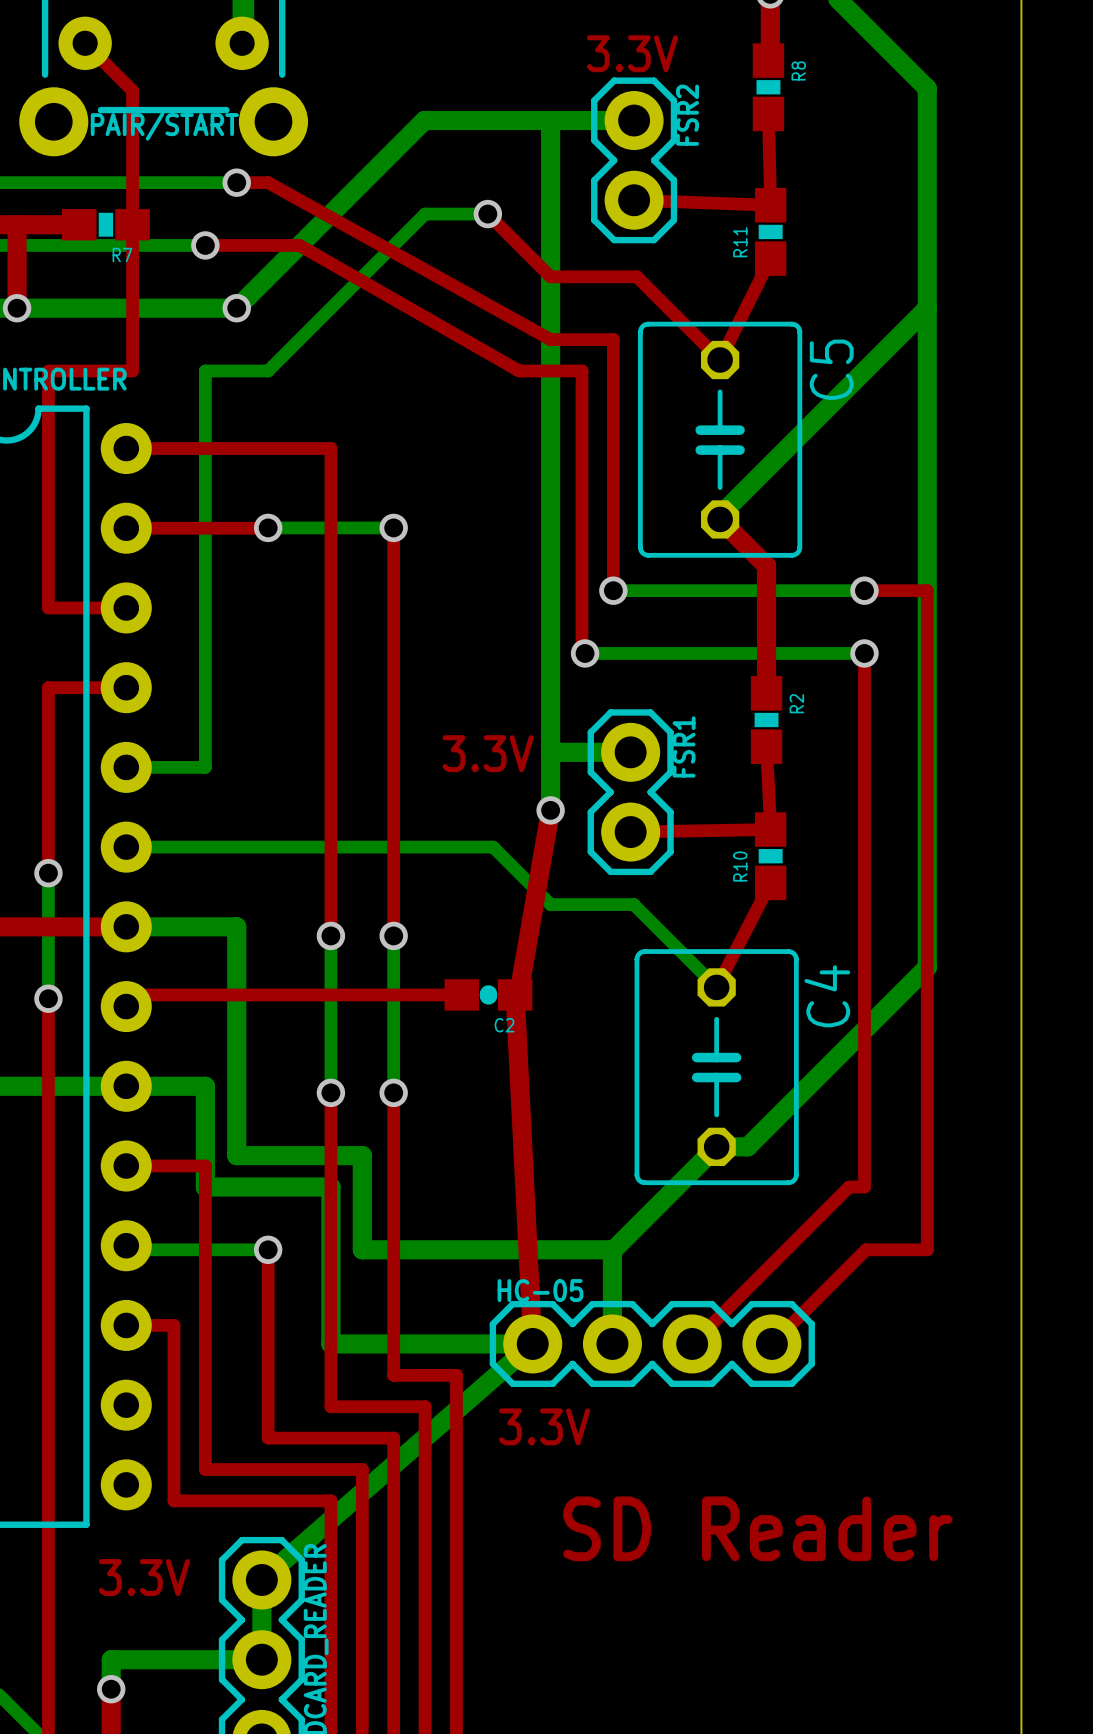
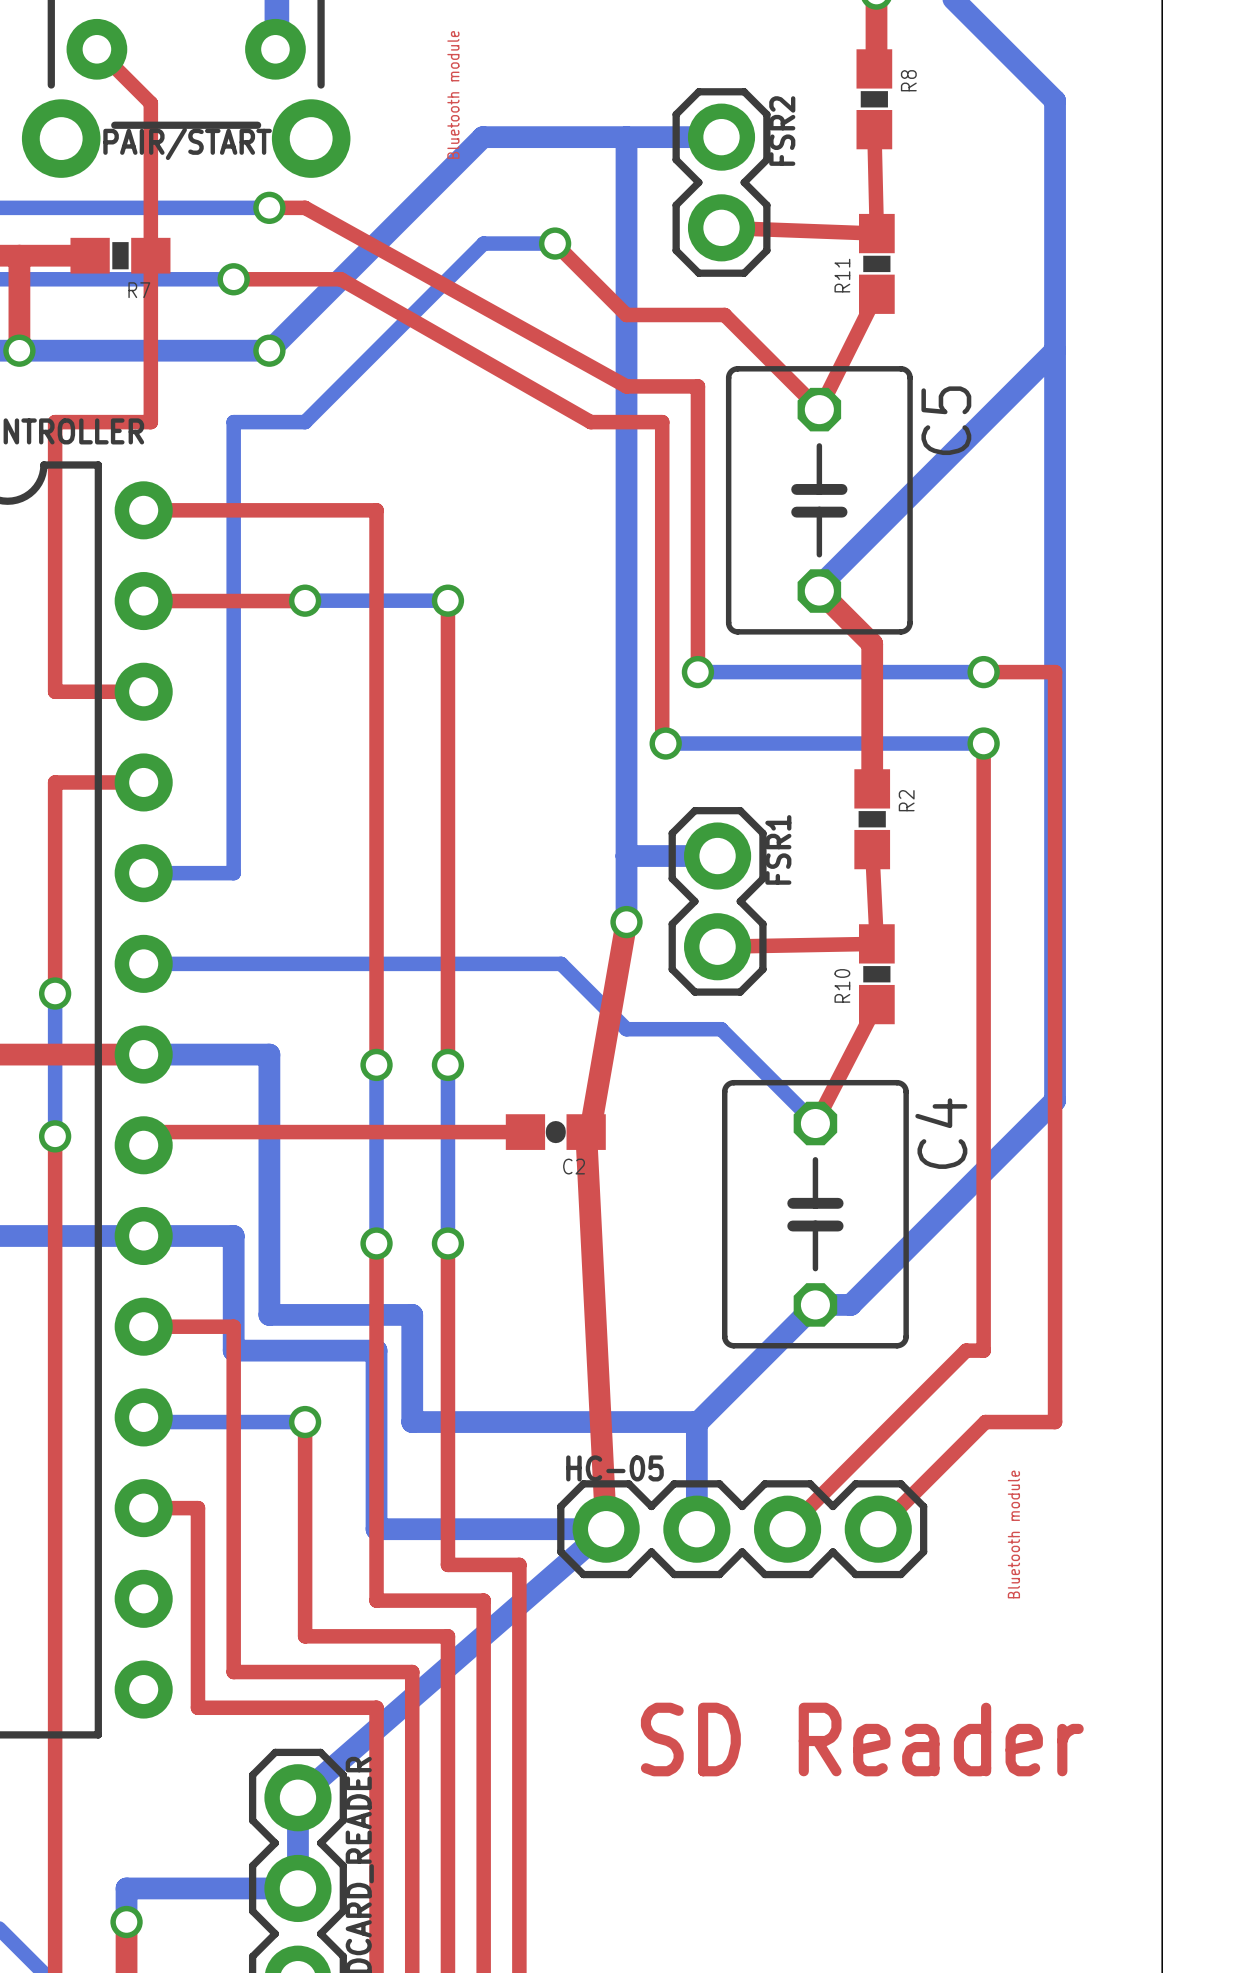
text: 3.3V (632, 53) -> none
text: none -> Bluetooth module (453, 94)
text: 3.3V (488, 753) -> none
text: none -> Bluetooth module (1013, 1534)
text: 3.3V (544, 1426) -> none
text: 3.3V (144, 1577) -> none

